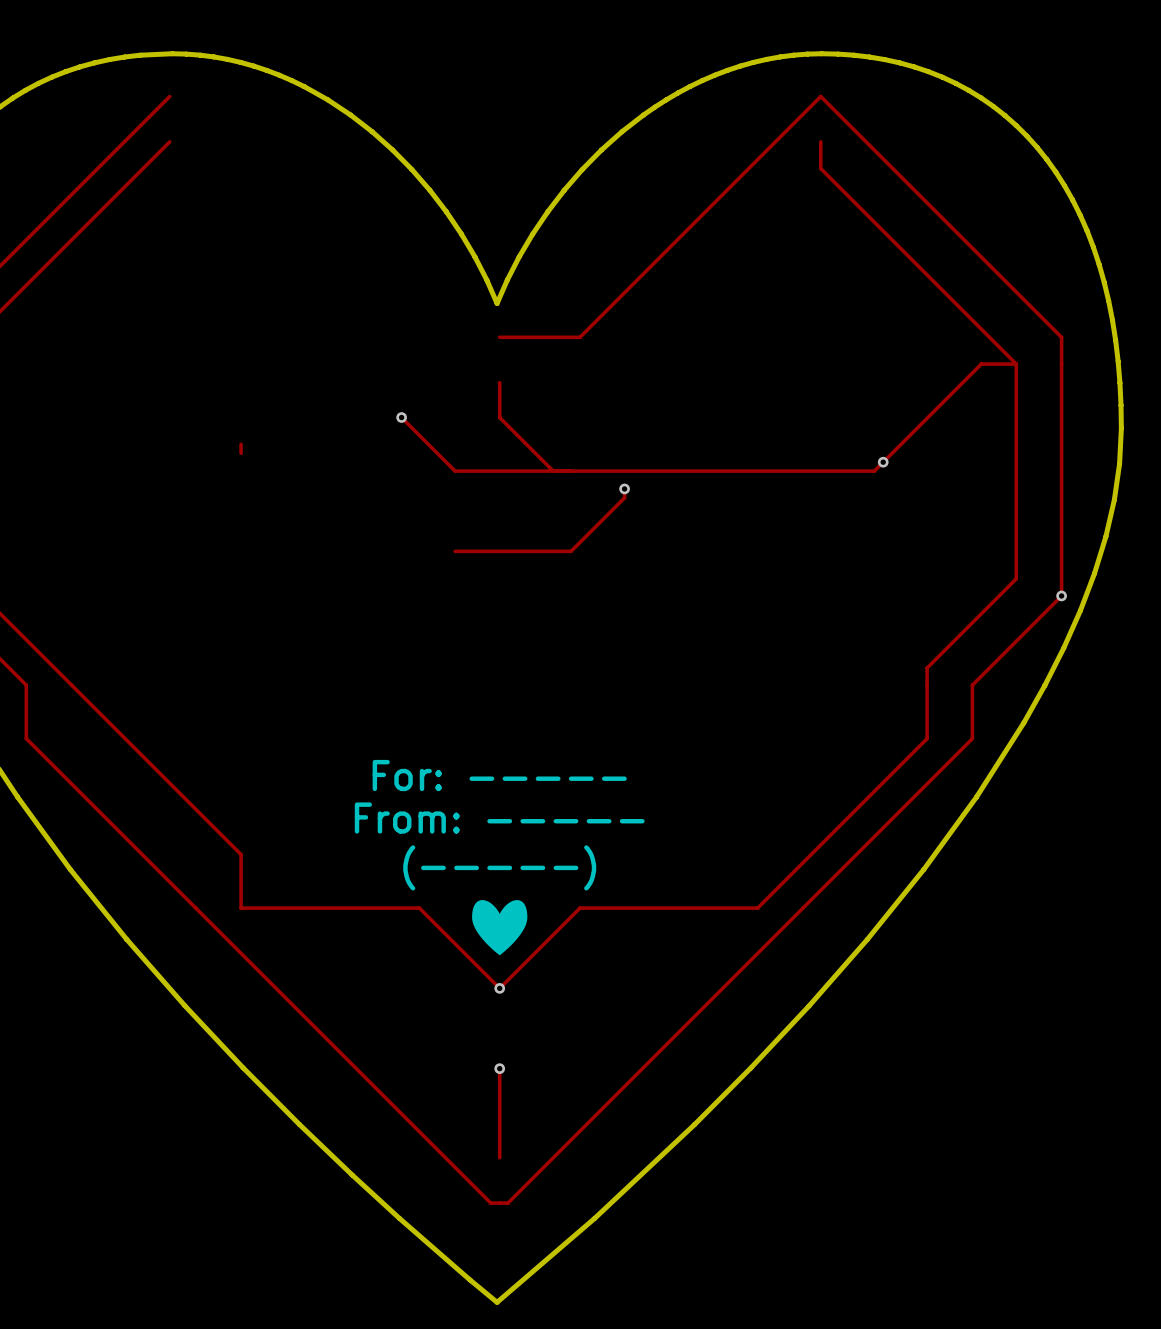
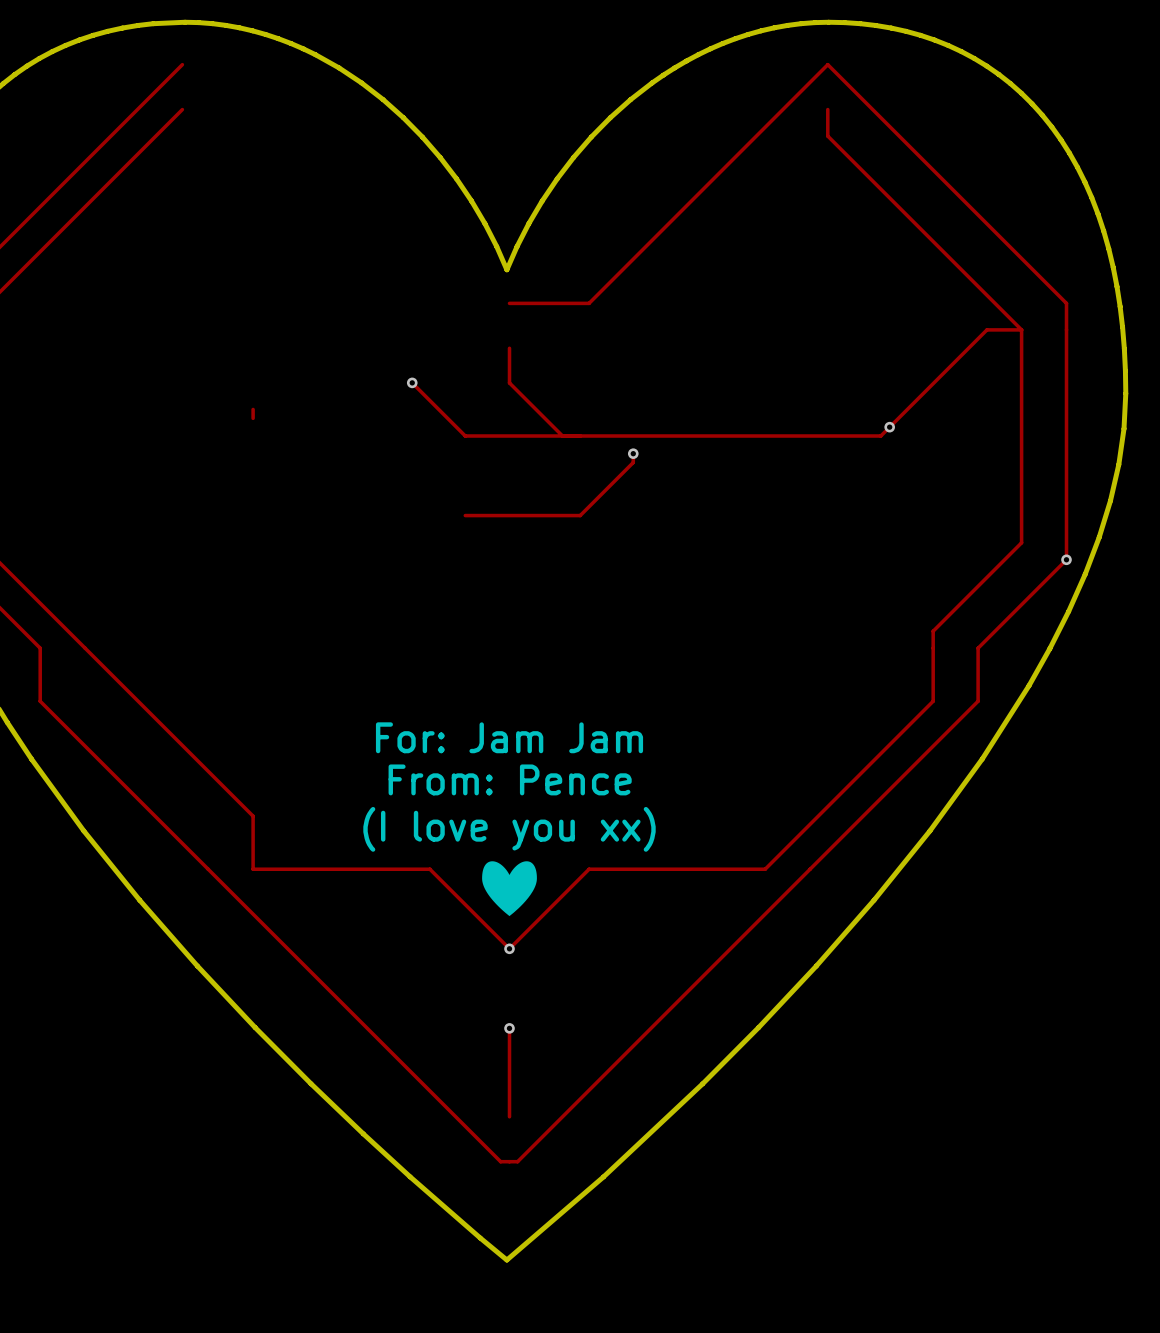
text: For: ----- (499, 775) -> For: Jam Jam (509, 737)
text: From: ----- (499, 818) -> From: Pence (510, 779)
text: (-----) (499, 867) -> (I love you xx) (509, 829)

